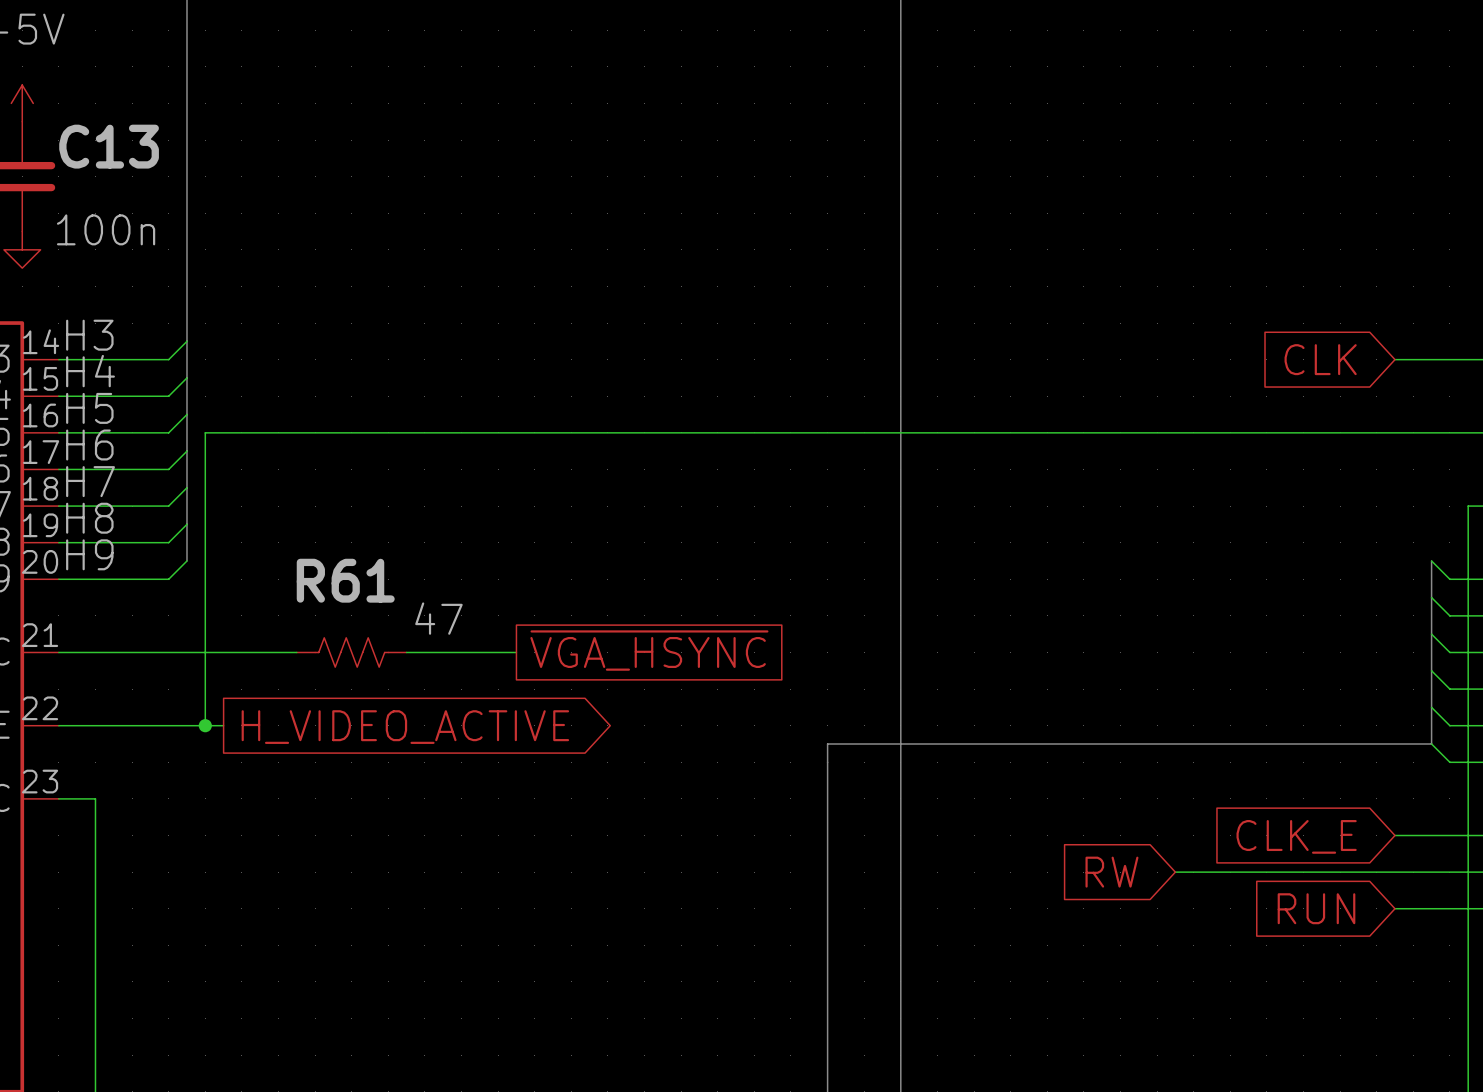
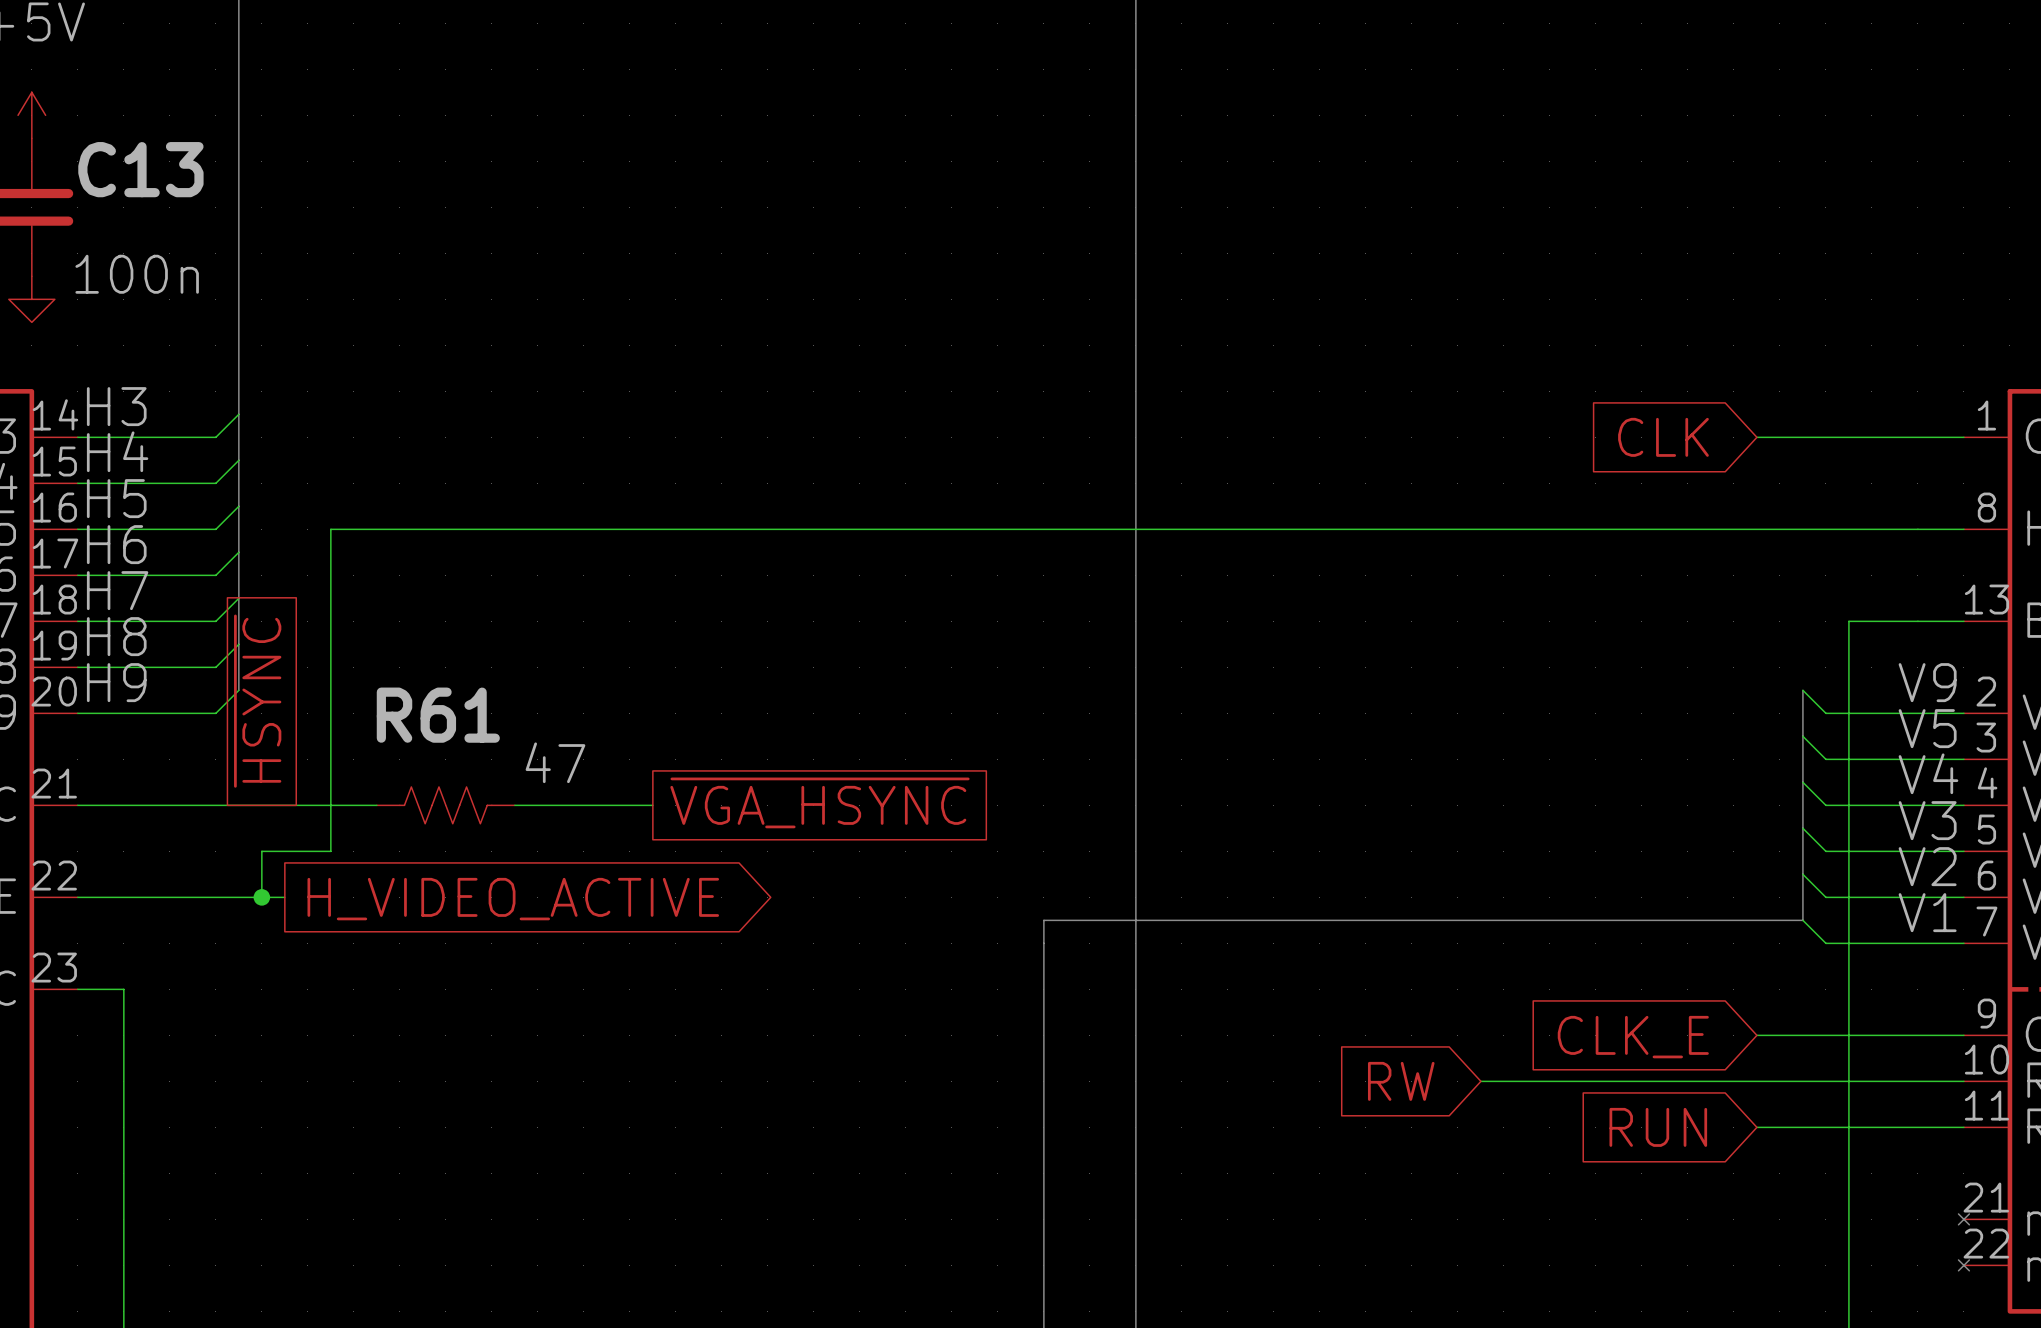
wire: (260, 432) (205, 432) (205, 689) -> (330, 529) (330, 851) (261, 851)
global label: none -> ~{HSYNC} (257, 701)

